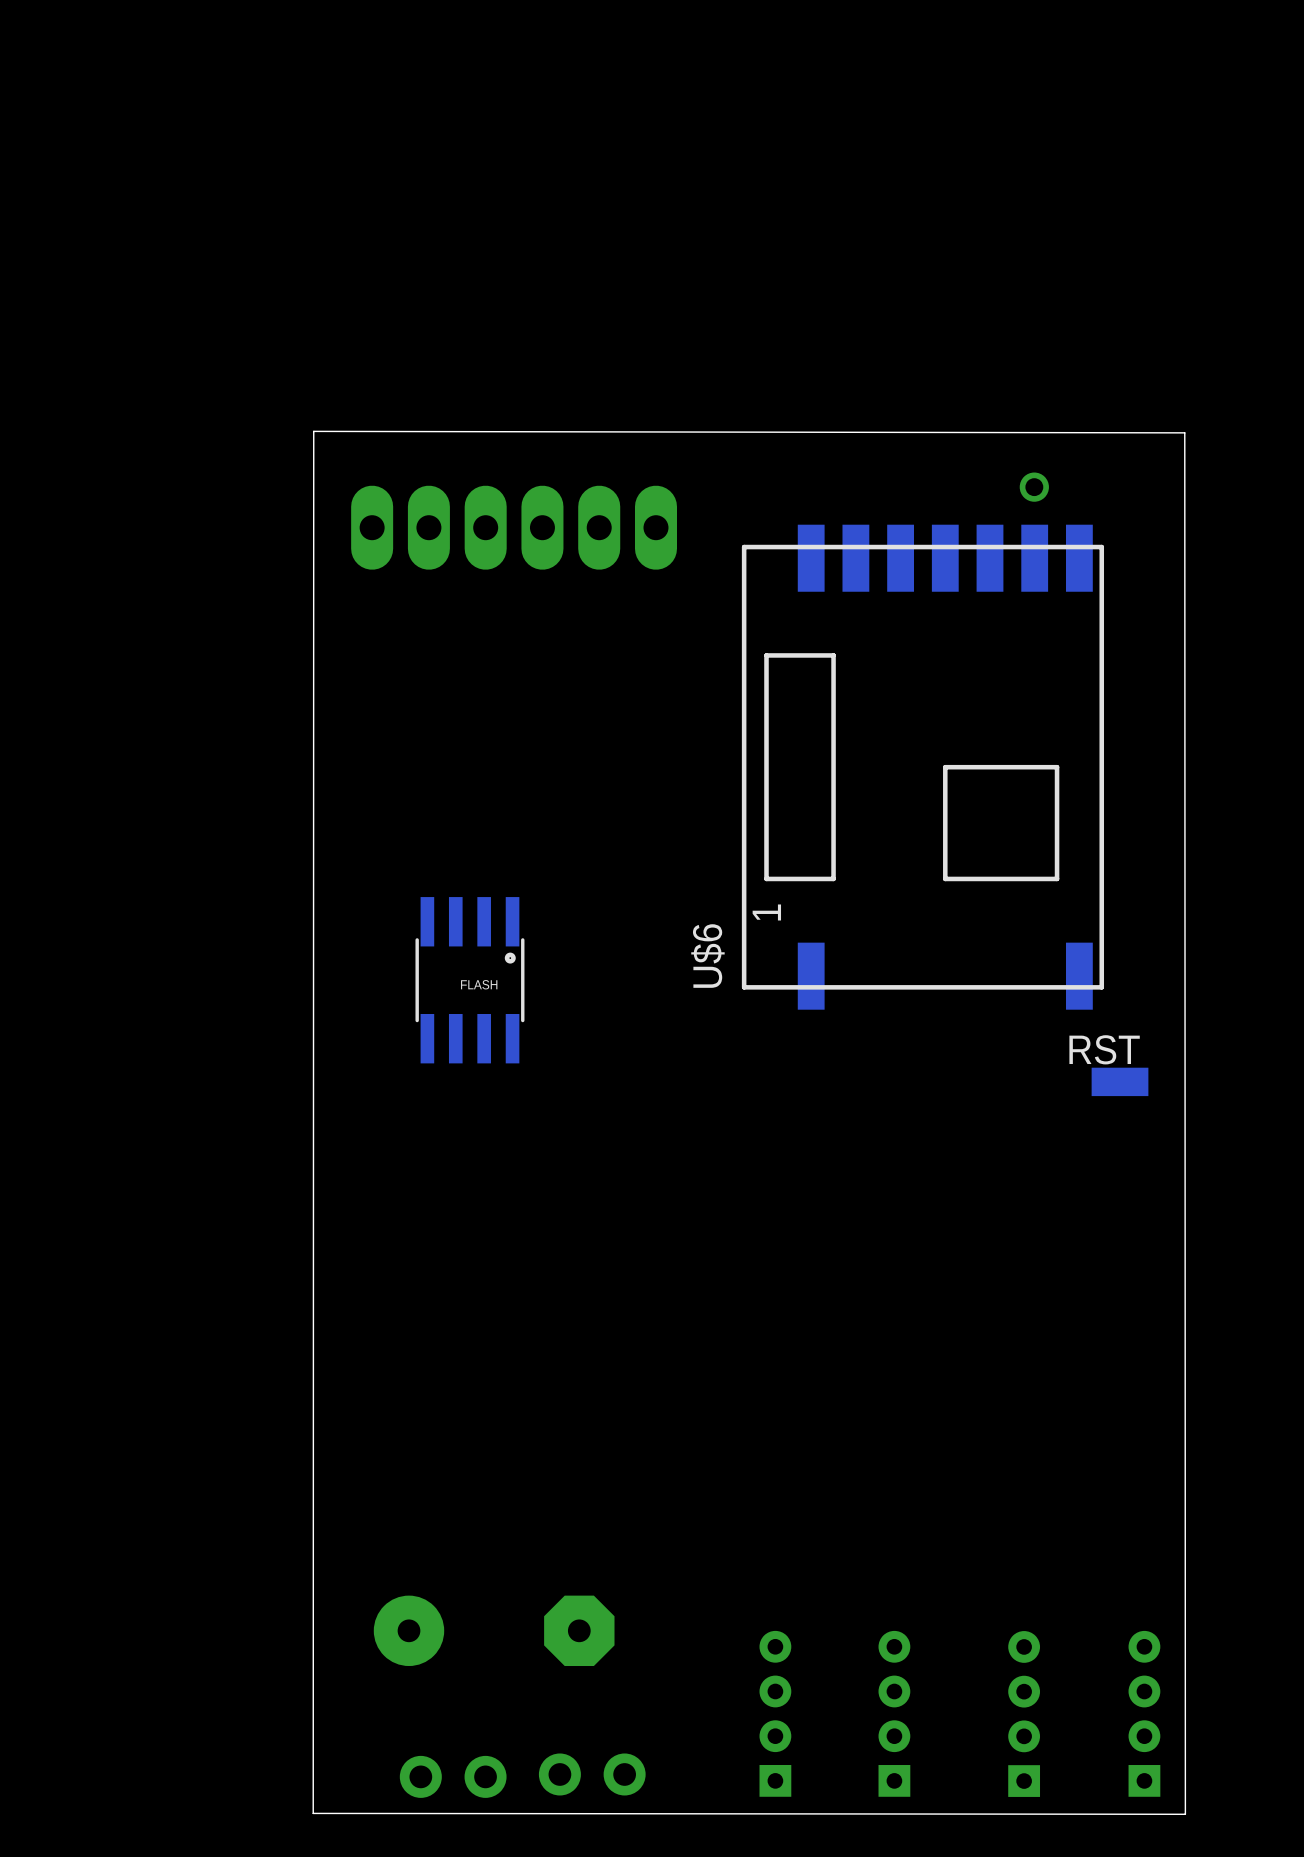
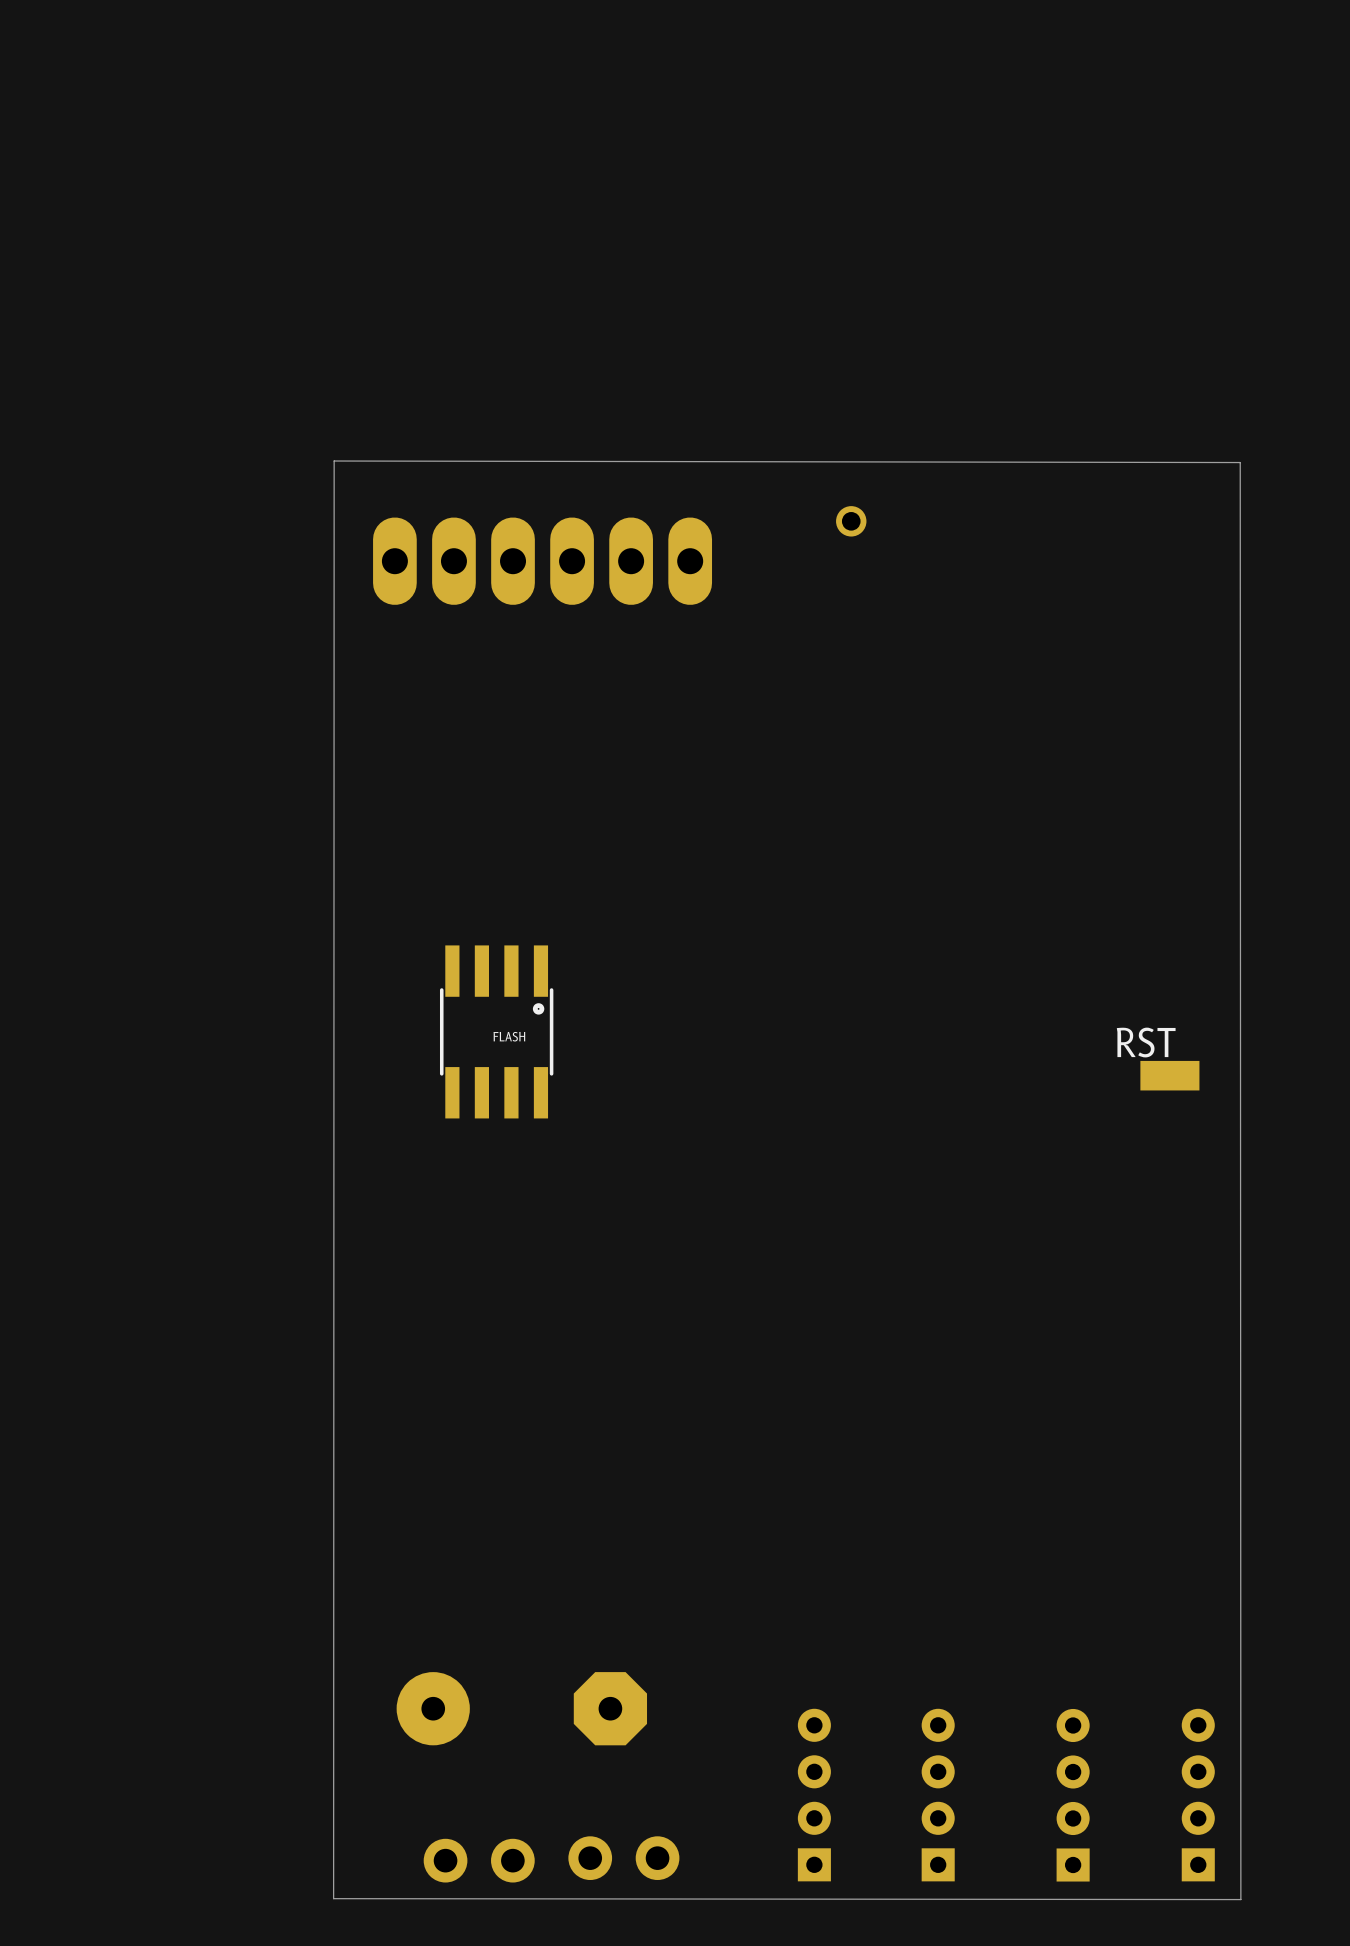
part position: (1034, 487) -> (851, 521)
U$6: (922, 767) -> none
RST position: (1120, 1081) -> (1169, 1075)

